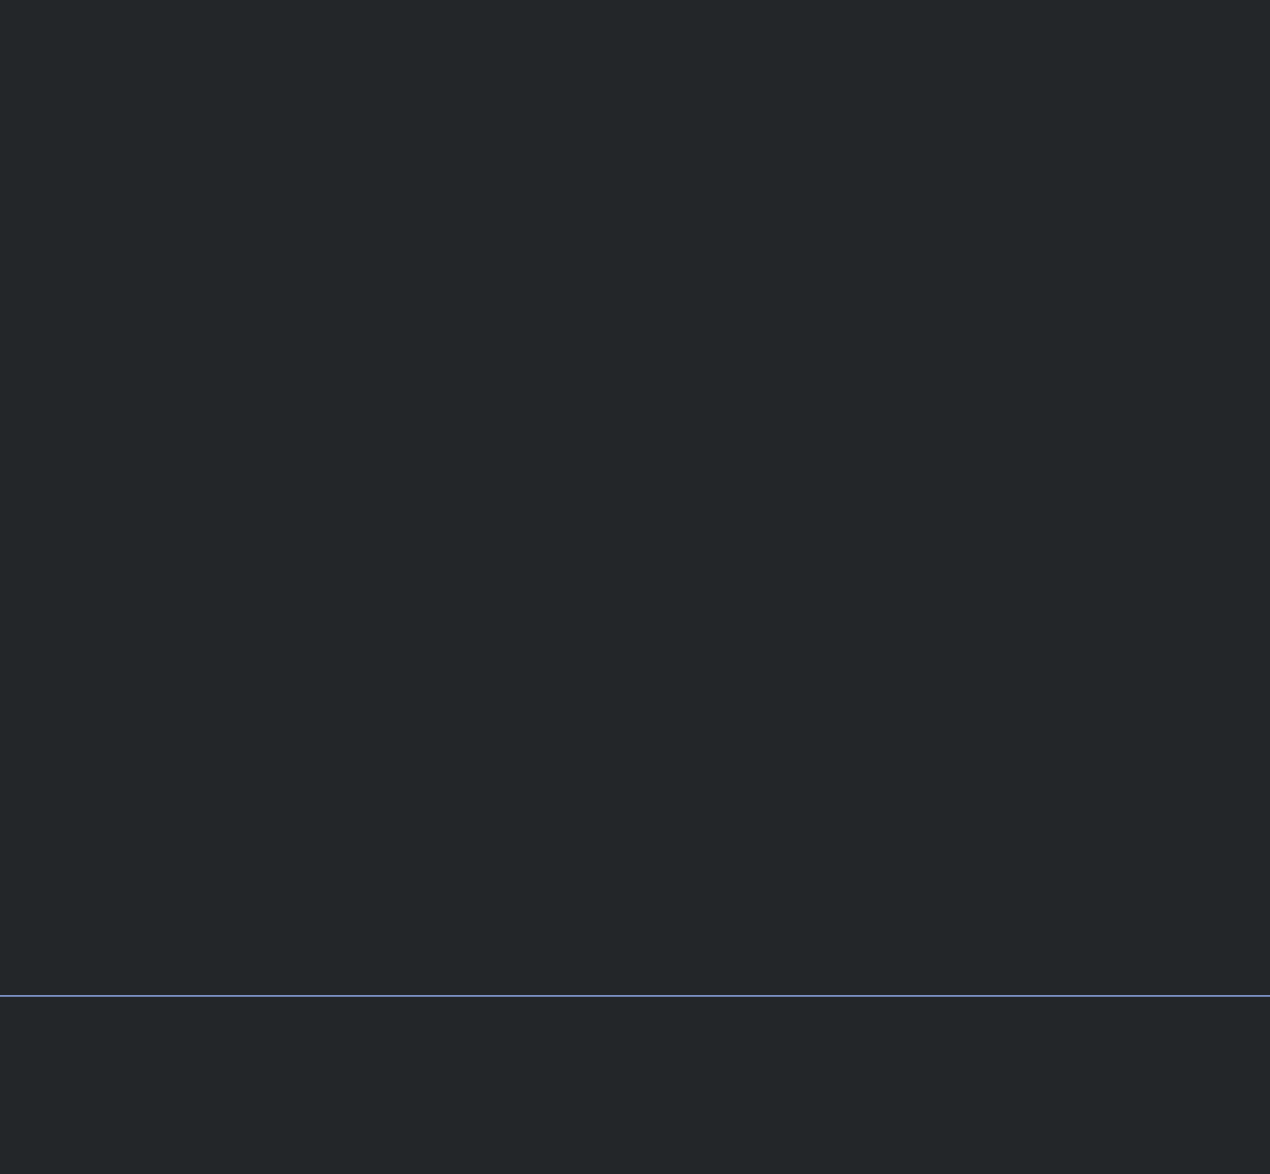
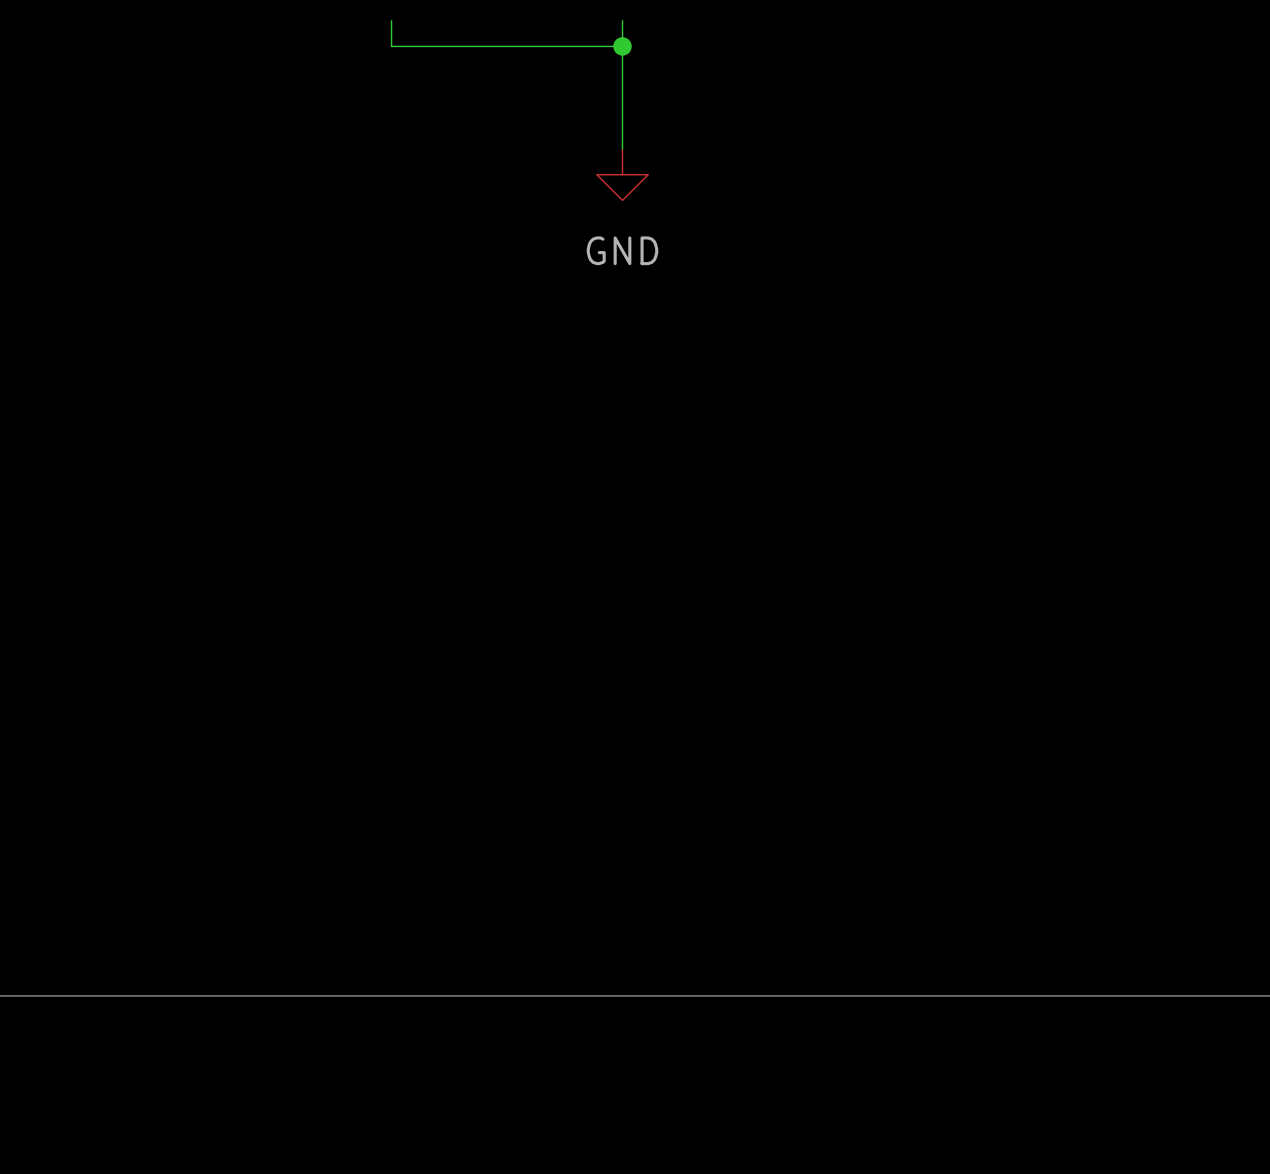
wire: none -> (391, 20) (391, 46) (622, 46)
wire: none -> (622, 20) (622, 149)
junction: none -> (622, 46)
power symbol: none -> GND (622, 174)

